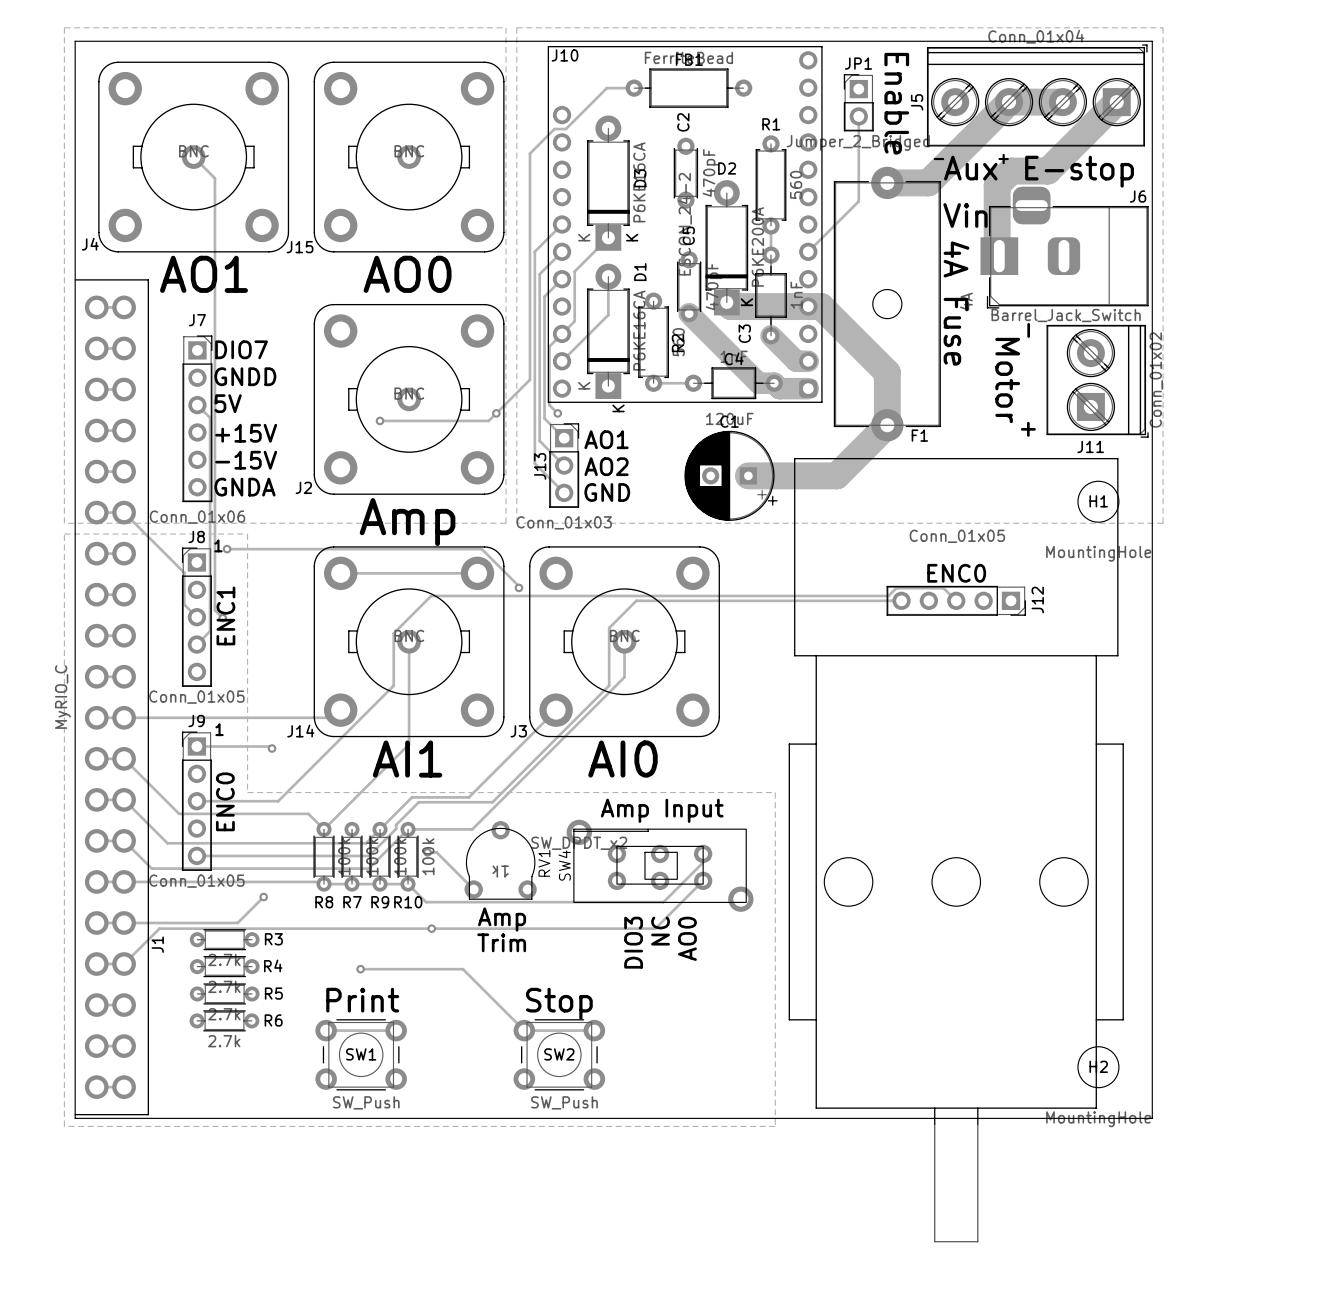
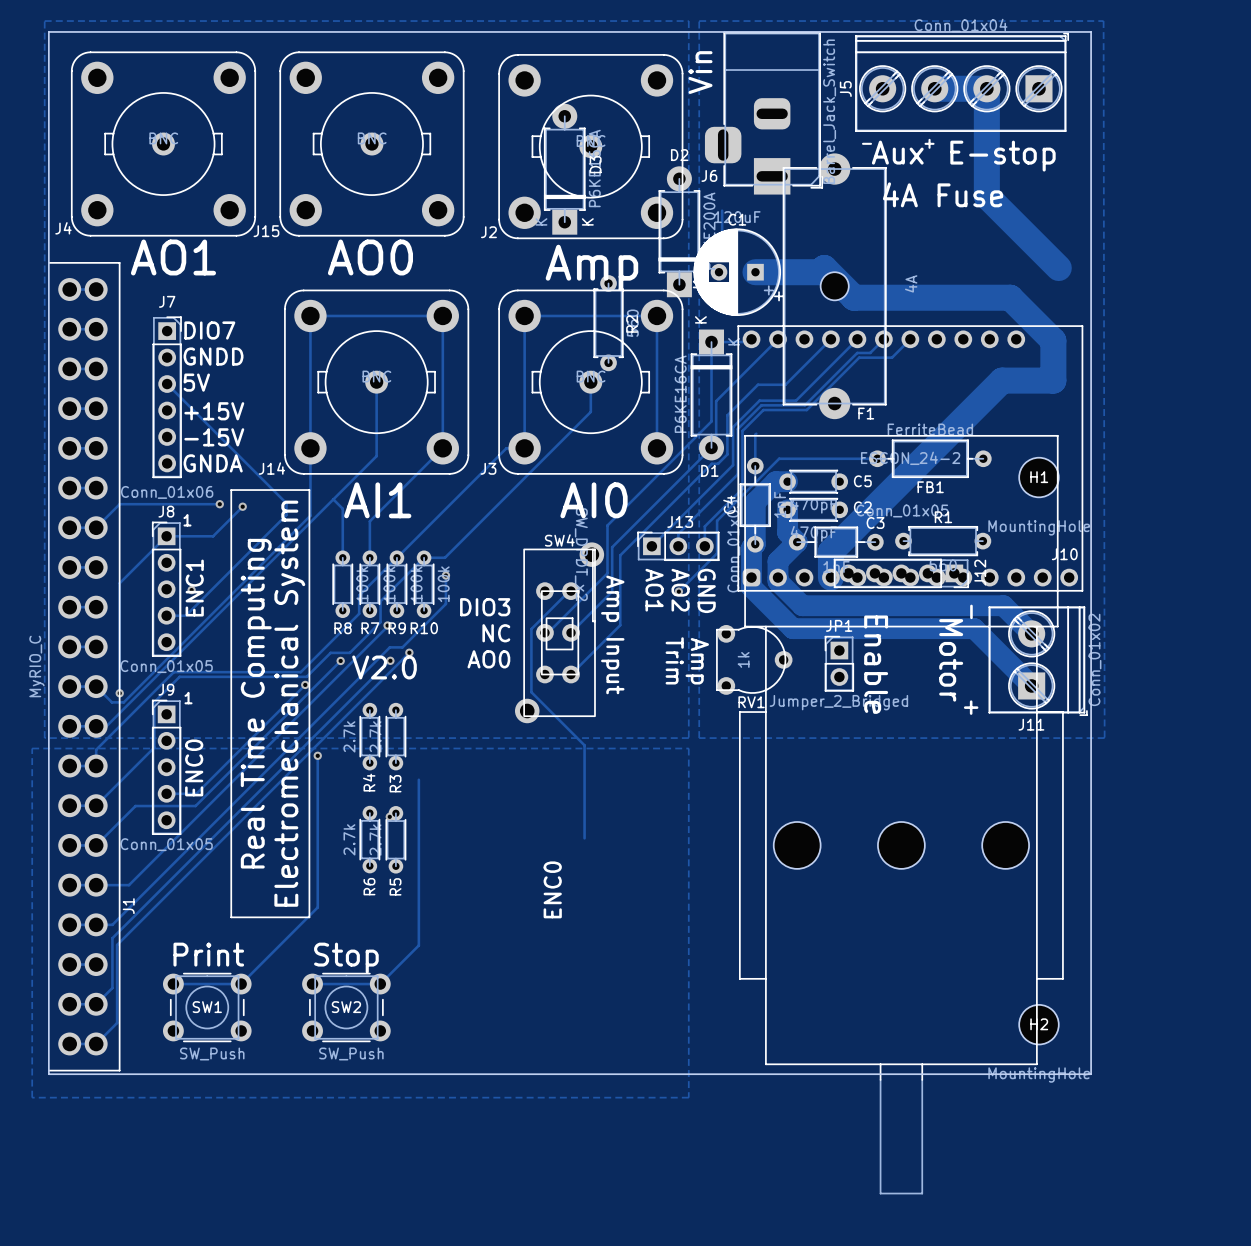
zone outline: (64, 27) (64, 523) (506, 523) (506, 27) (64, 27) -> none
zone outline: (516, 27) (1163, 27) (1163, 523) (516, 523) (516, 27) -> none
zone outline: none -> (44, 21) (44, 738) (688, 738) (688, 21) (44, 21)
zone outline: none -> (699, 21) (1103, 21) (1104, 738) (699, 738) (699, 21)
J10 name position: J10 (565, 55) -> J10 (1064, 554)
FB1 name position: FB1 (689, 59) -> FB1 (930, 487)
track: (634, 88) (606, 88) (565, 129) (554, 129) (530, 153) (530, 379) (488, 420) (380, 420) -> none
FB1 position: (688, 88) -> (930, 458)
J5 position: (1037, 95) -> (962, 82)
track: none -> (934, 88) (986, 88) (986, 196) (1058, 268)
JP1 position: (858, 102) -> (839, 663)
track: (1062, 102) (1009, 102) (928, 182) (887, 182) -> none
track: (1116, 102) (1047, 171) (1011, 171) (997, 185) (997, 253) (999, 256) -> none
text: Enable (896, 103) -> none
track: (858, 116) (858, 201) (808, 251) -> none
R1 name position: R1 (771, 124) -> R1 (943, 517)
track: (193, 157) (214, 178) (214, 610) (222, 618) -> none
text position: - (939, 159) -> - (867, 143)
text position: + (1003, 159) -> + (929, 143)
text position: Aux (970, 168) -> Aux (897, 152)
text position: E-stop (1079, 171) -> E-stop (1002, 156)
C2 rotation: 0° (685, 173) -> 90° clockwise (813, 509)
C2 position: (685, 173) -> (813, 509)
R1 rotation: 0° (771, 184) -> 90° clockwise (943, 541)
R1 position: (771, 184) -> (943, 541)
J6 name position: J6 (1138, 196) -> J6 (709, 175)
text rotation: 0° (965, 215) -> 90° counterclockwise (700, 72)
text position: Vin (965, 215) -> Vin (700, 72)
track: (562, 224) (534, 251) (534, 463) (564, 492) -> none
J10 rotation: 0° (685, 224) -> 90° clockwise (910, 458)
J10 position: (685, 224) -> (910, 458)
track: (608, 237) (574, 271) (574, 321) (549, 346) (549, 405) (557, 413) -> none
J6 rotation: 0° (1064, 247) -> 90° counterclockwise (763, 113)
J6 position: (1064, 247) -> (763, 113)
track: (562, 251) (539, 274) (539, 441) (564, 465) -> none
D1 name position: D1 (640, 272) -> D1 (709, 470)
track: (608, 276) (608, 314) (562, 361) -> none
track: (562, 279) (544, 296) (544, 418) (564, 438) -> none
text: none -> Amp (591, 267)
C5 rotation: 0° (689, 286) -> 90° clockwise (813, 481)
C5 position: (689, 286) -> (813, 481)
track: none -> (755, 272) (820, 272) (824, 268) (853, 297) (1010, 297) (1053, 340) (1053, 380) (1002, 380) (830, 551) (830, 577)
C3 rotation: 0° (771, 295) -> 90° clockwise (836, 542)
C3 position: (771, 295) -> (836, 542)
track: (726, 302) (730, 306) (821, 306) (887, 372) (887, 425) (836, 475) (748, 475) -> none
text rotation: 0° (956, 303) -> 90° counterclockwise (943, 194)
track: (689, 313) (758, 383) (774, 383) (779, 388) (808, 388) -> none
text: - (1028, 330) -> none
D1 rotation: 0° (608, 331) -> 180° (711, 394)
D1 position: (608, 331) -> (711, 394)
C3 name position: C3 (744, 333) -> C3 (875, 522)
track: (771, 335) (796, 361) (808, 361) -> none
C4 name position: C4 (734, 358) -> C4 (729, 504)
track: none -> (751, 339) (748, 342) (711, 342) (711, 421) (607, 525) (607, 573) (548, 632) (544, 632)
track: none -> (778, 339) (716, 401) (716, 443) (612, 547) (612, 591) (571, 632)
track: none -> (830, 339) (785, 384) (757, 384) (727, 415) (727, 454) (718, 463) (711, 463) (620, 555) (620, 625) (571, 674)
track: none -> (857, 339) (796, 400) (759, 400) (733, 427) (733, 465) (651, 546)
track: none -> (883, 339) (870, 352) (857, 352) (804, 405) (761, 405) (737, 429) (737, 474) (678, 533) (678, 546)
track: none -> (910, 339) (892, 357) (859, 357) (806, 410) (763, 410) (742, 431) (742, 488) (704, 526) (704, 546)
text: Motor (1007, 380) -> none
J11 position: (1097, 381) -> (1038, 661)
track: (653, 383) (693, 383) -> none
C4 rotation: 0° (733, 383) -> 90° clockwise (755, 505)
C4 position: (733, 383) -> (755, 505)
J2 position: (409, 399) -> (590, 146)
via: (496, 413) -> none
via: (557, 413) -> none
track: (210, 417) (210, 631) (196, 644) -> (179, 396) (286, 503) (286, 515) (185, 615) (166, 615)
via: (380, 420) -> none
text: + (1028, 429) -> none
text rotation: 0° (606, 439) -> 90° clockwise (654, 590)
text position: AO1 (606, 439) -> AO1 (654, 590)
track: none -> (756, 433) (755, 466)
J13 rotation: 0° (564, 465) -> 90° counterclockwise (678, 546)
J13 position: (564, 465) -> (678, 546)
J13 name position: J13 (540, 466) -> J13 (680, 521)
text rotation: 0° (606, 466) -> 90° clockwise (680, 590)
text position: AO2 (606, 466) -> AO2 (680, 590)
C1 position: (731, 475) -> (738, 272)
track: none -> (877, 458) (779, 458) (717, 520) (717, 553) (678, 591)
text rotation: 0° (607, 492) -> 90° clockwise (706, 590)
text position: GND (607, 492) -> GND (706, 590)
track: none -> (787, 481) (775, 481) (755, 502) (755, 544) (751, 547) (751, 587) (792, 628) (974, 628) (1031, 685)
track: (124, 512) (184, 572) (184, 604) (196, 617) -> none
line: none -> (231, 490) (231, 917) (309, 917) (309, 490) (231, 490)
text: Amp (407, 522) -> none
track: none -> (333, 499) (342, 508) (342, 557)
track: none -> (219, 504) (119, 504) (96, 527)
via: none -> (219, 504)
track: none -> (242, 506) (213, 536) (166, 536) (119, 583) (119, 693)
via: none -> (242, 506)
zone outline: (64, 534) (247, 534) (247, 792) (775, 792) (775, 1126) (64, 1126) (64, 534) -> (32, 748) (32, 1097) (688, 1097) (688, 748) (32, 748)
track: none -> (787, 509) (787, 532) (797, 542) (778, 561) (778, 581) (802, 605) (1003, 605) (1031, 633)
track: (227, 549) (481, 549) (518, 587) -> none
via: (227, 549) -> none
track: (340, 573) (477, 573) -> none
text: ENC0 (956, 573) -> none
via position: (518, 587) -> (445, 575)
track: (901, 600) (636, 600) (609, 628) (609, 685) (492, 802) (418, 802) (369, 855) (196, 855) -> none
track: (956, 600) (943, 588) (896, 588) (888, 595) (431, 595) (393, 633) (393, 685) (278, 801) (196, 801) -> none
track: none -> (571, 591) (531, 629) (531, 692) (584, 745) (584, 838)
via: none -> (678, 591)
text: none -> DIO3 (485, 607)
text: none -> - (971, 611)
track: (409, 641) (409, 744) (324, 829) (308, 813) (179, 813) (124, 758) -> (376, 382) (376, 456) (106, 726) (96, 726)
J14 position: (409, 641) -> (376, 382)
track: (624, 641) (624, 677) (472, 829) (408, 829) (368, 868) (151, 868) (124, 840) -> (590, 382) (590, 411) (444, 557) (424, 557) (380, 601) (380, 622) (349, 652) (330, 652) (306, 676) (179, 676) (154, 702) (154, 747) (96, 805)
J3 position: (624, 641) -> (590, 382)
via: none -> (387, 625)
text: none -> NC (496, 633)
track: none -> (409, 652) (117, 944) (117, 1023) (96, 1043)
via: none -> (409, 652)
text: none -> Motor (951, 660)
via: none -> (340, 660)
track: none -> (390, 660) (112, 938) (112, 988) (96, 1004)
via: none -> (390, 660)
text: none -> Trim (674, 660)
text: none -> Amp (697, 661)
text: none -> Enable (876, 664)
text: none -> V2.0 (384, 667)
track: (340, 710) (333, 717) (124, 717) -> (369, 557) (369, 521) (442, 448) (442, 315) (310, 315) (310, 515) (123, 702) (111, 702) (96, 686)
track: (556, 710) (468, 797) (412, 797) (366, 843) (167, 843) (124, 799) -> (657, 448) (657, 315) (524, 315) (524, 448) (506, 448) (359, 595) (359, 613) (300, 672) (173, 672) (96, 749) (96, 766)
track: none -> (305, 684) (196, 793) (166, 793)
via: none -> (305, 684)
via: none -> (119, 693)
text: none -> Real Time Computing (256, 703)
text: none -> Electromechanical System (289, 703)
text: none -> + (971, 707)
track: (196, 746) (270, 746) (272, 748) -> none
via: (272, 748) -> none
text position: AI1 (407, 759) -> AI1 (377, 500)
text position: AI0 (622, 759) -> AI0 (594, 500)
track: none -> (317, 755) (317, 907) (241, 984) (173, 984)
via: none -> (317, 755)
text rotation: 0° (662, 810) -> 90° clockwise (612, 634)
track: none -> (418, 779) (418, 945) (380, 984) (312, 984)
track: (427, 852) (436, 852) (473, 889) -> none
track: (703, 853) (703, 862) (663, 902) (426, 902) (408, 884) (324, 884) (321, 881) (124, 881) -> (340, 660) (195, 806) (135, 806) (96, 845)
R8 position: (324, 856) -> (342, 584)
R7 position: (352, 856) -> (369, 584)
R9 position: (380, 856) -> (396, 584)
R10 position: (408, 856) -> (424, 584)
RV1 rotation: 0° (500, 860) -> 90° clockwise (754, 659)
RV1 position: (500, 860) -> (754, 659)
SW4 rotation: 0° (660, 865) -> 90° clockwise (559, 632)
SW4 position: (660, 865) -> (559, 632)
track: (703, 880) (655, 928) (159, 928) (124, 964) -> (445, 575) (445, 603) (402, 647) (389, 647) (112, 924) (96, 924)
track: (263, 897) (237, 922) (158, 922) -> (387, 625) (129, 885)
via: (263, 897) -> none
text: Amp (502, 919) -> none
text: none -> ENC0 (552, 889)
via: (431, 928) -> none
text: NC (660, 931) -> none
text rotation: 0° (687, 938) -> 90° clockwise (488, 659)
text position: AO0 (687, 938) -> AO0 (488, 659)
R3 rotation: 0° (224, 939) -> 90° clockwise (395, 736)
R3 position: (224, 939) -> (395, 736)
text: Trim (501, 942) -> none
text: DIO3 (633, 942) -> none
R4 rotation: 0° (224, 966) -> 90° clockwise (369, 736)
R4 position: (224, 966) -> (369, 736)
track: (360, 969) (462, 969) (524, 1030) (594, 1030) -> none
via: (360, 969) -> none
R5 rotation: 0° (224, 993) -> 90° clockwise (395, 839)
R5 position: (224, 993) -> (395, 839)
text position: Print (362, 1000) -> Print (208, 954)
text position: Stop (559, 1003) -> Stop (346, 958)
R6 rotation: 0° (224, 1020) -> 90° clockwise (369, 839)
R6 position: (224, 1020) -> (369, 839)
track: (326, 1030) (396, 1030) -> none
SW1 position: (361, 1054) -> (207, 1007)
SW2 position: (559, 1054) -> (346, 1007)

